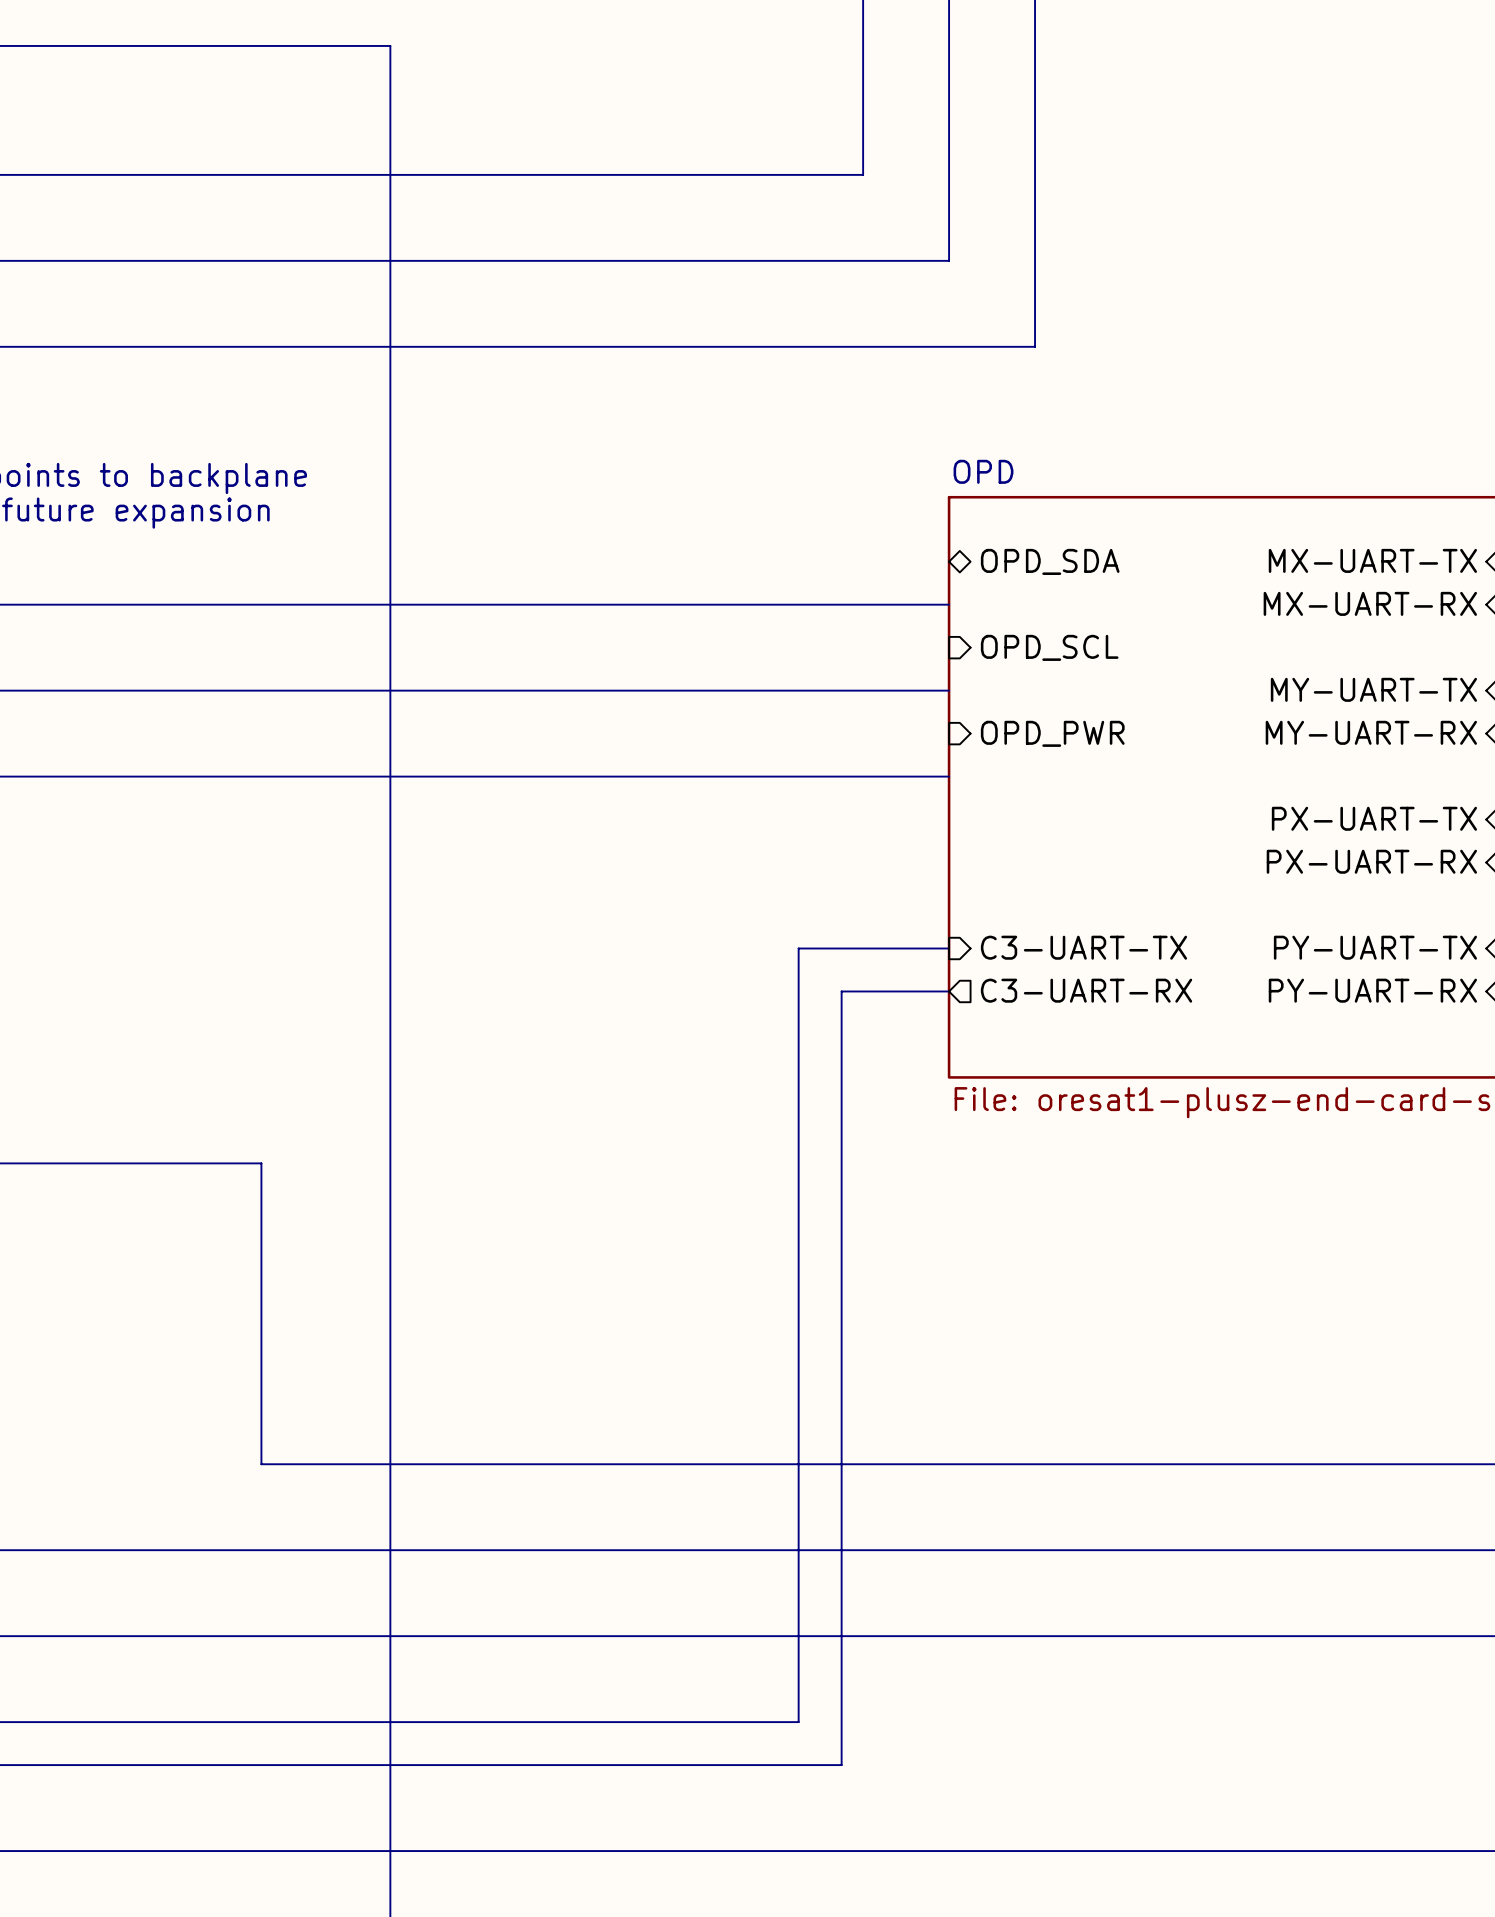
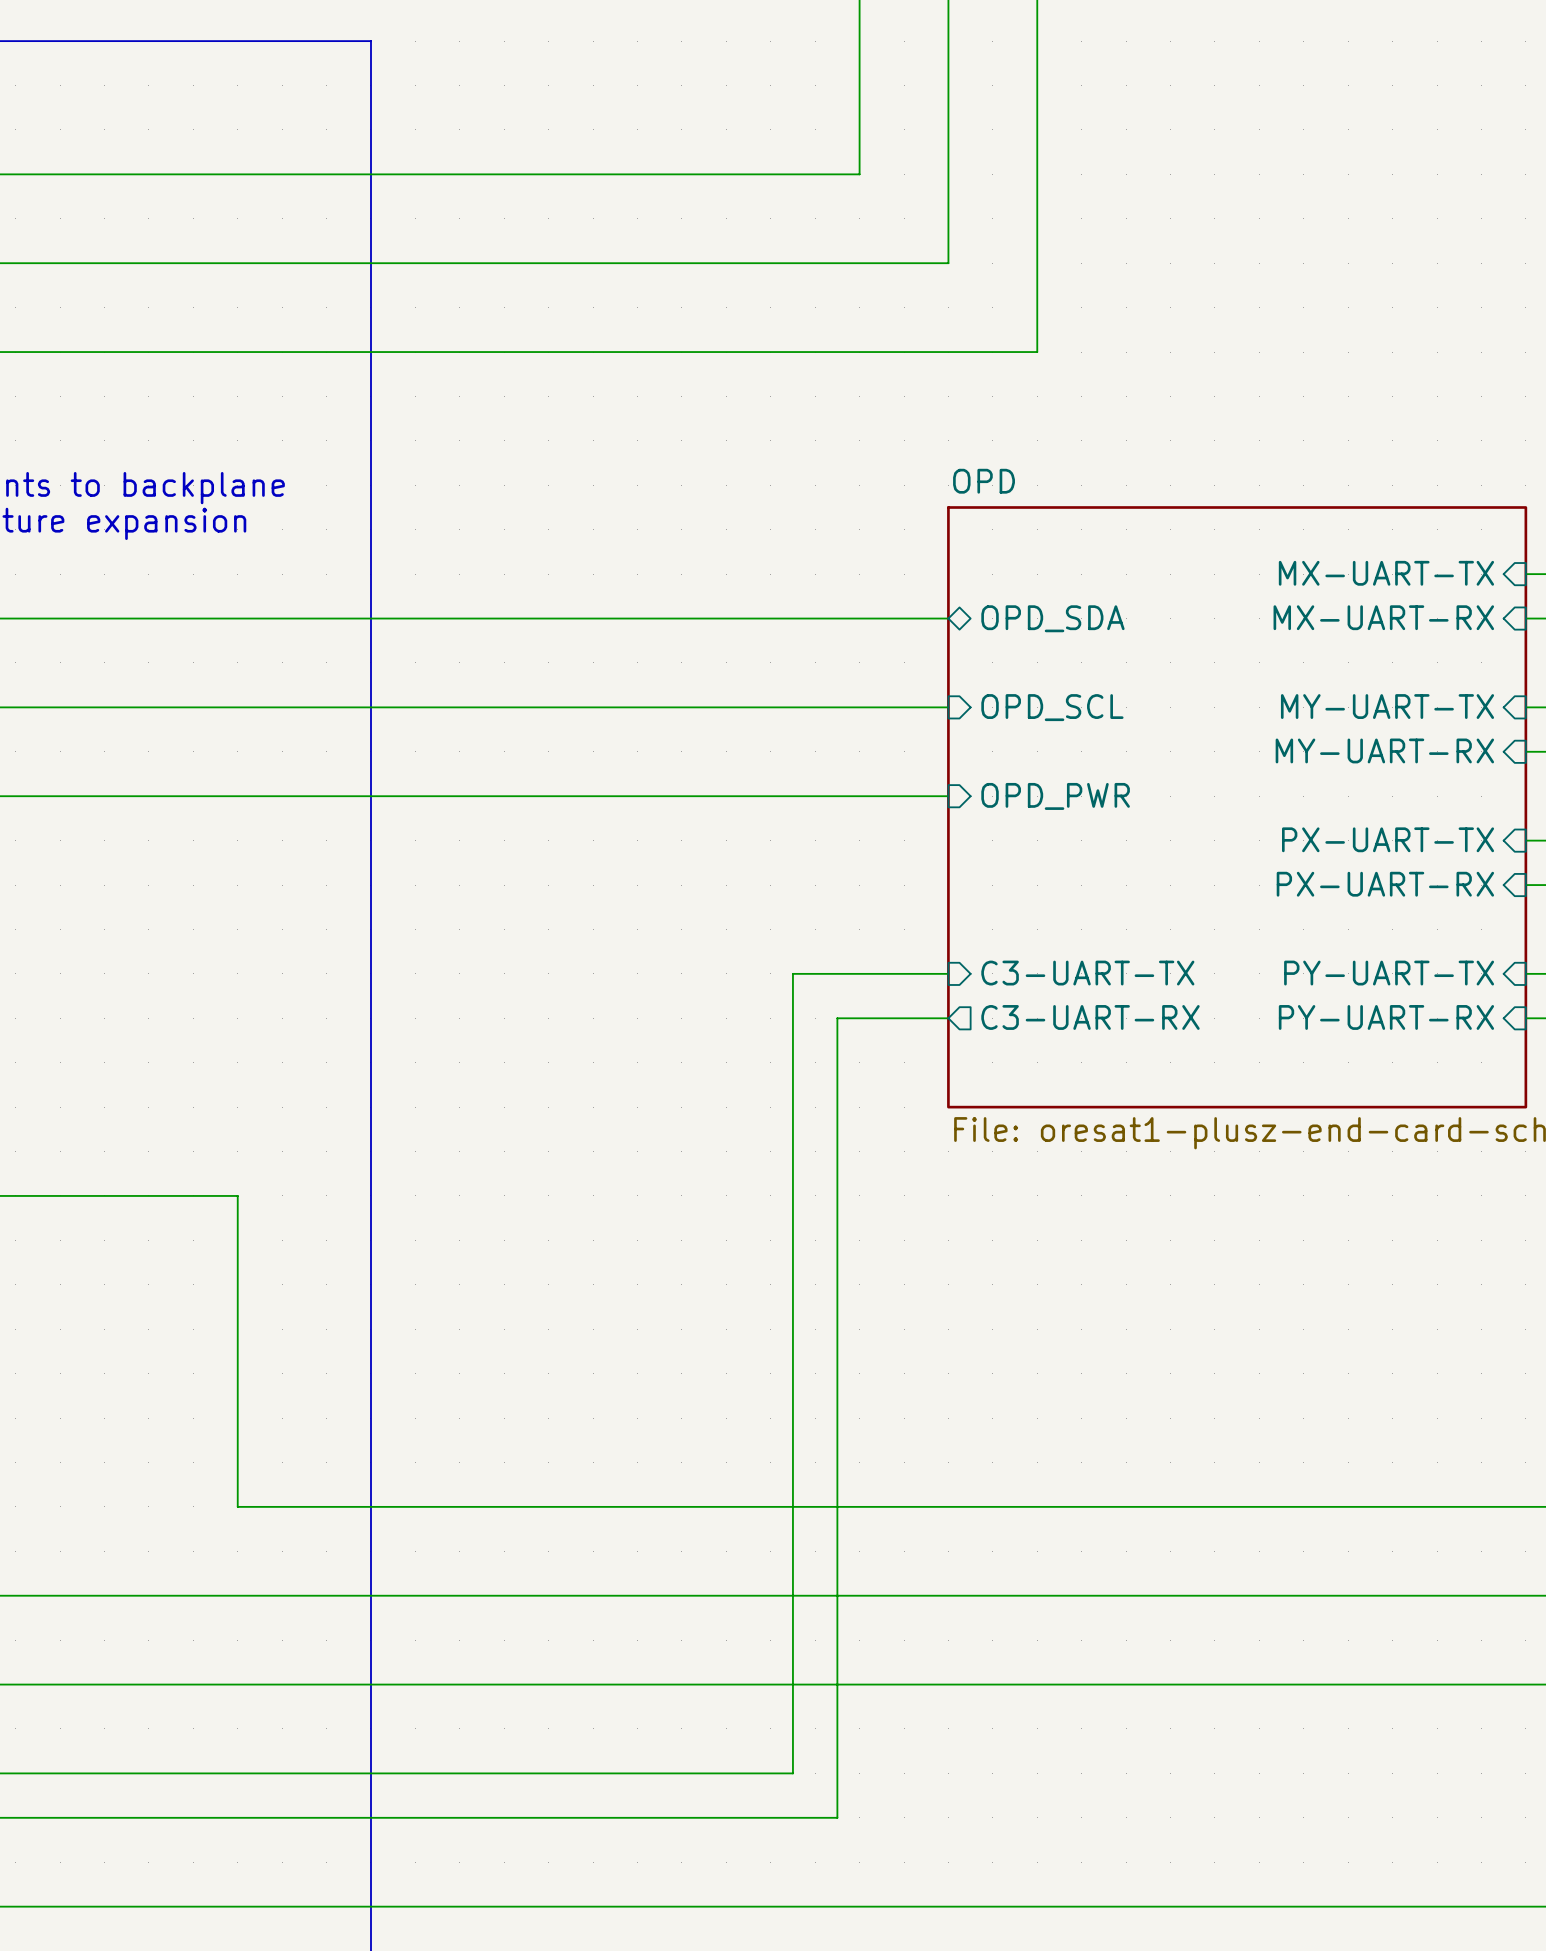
sheet pin position: OPD_SDA (1050, 561) -> OPD_SDA (1052, 618)
sheet pin position: OPD_SCL (1049, 647) -> OPD_SCL (1052, 707)
sheet pin position: OPD_PWR (1052, 733) -> OPD_PWR (1055, 796)

